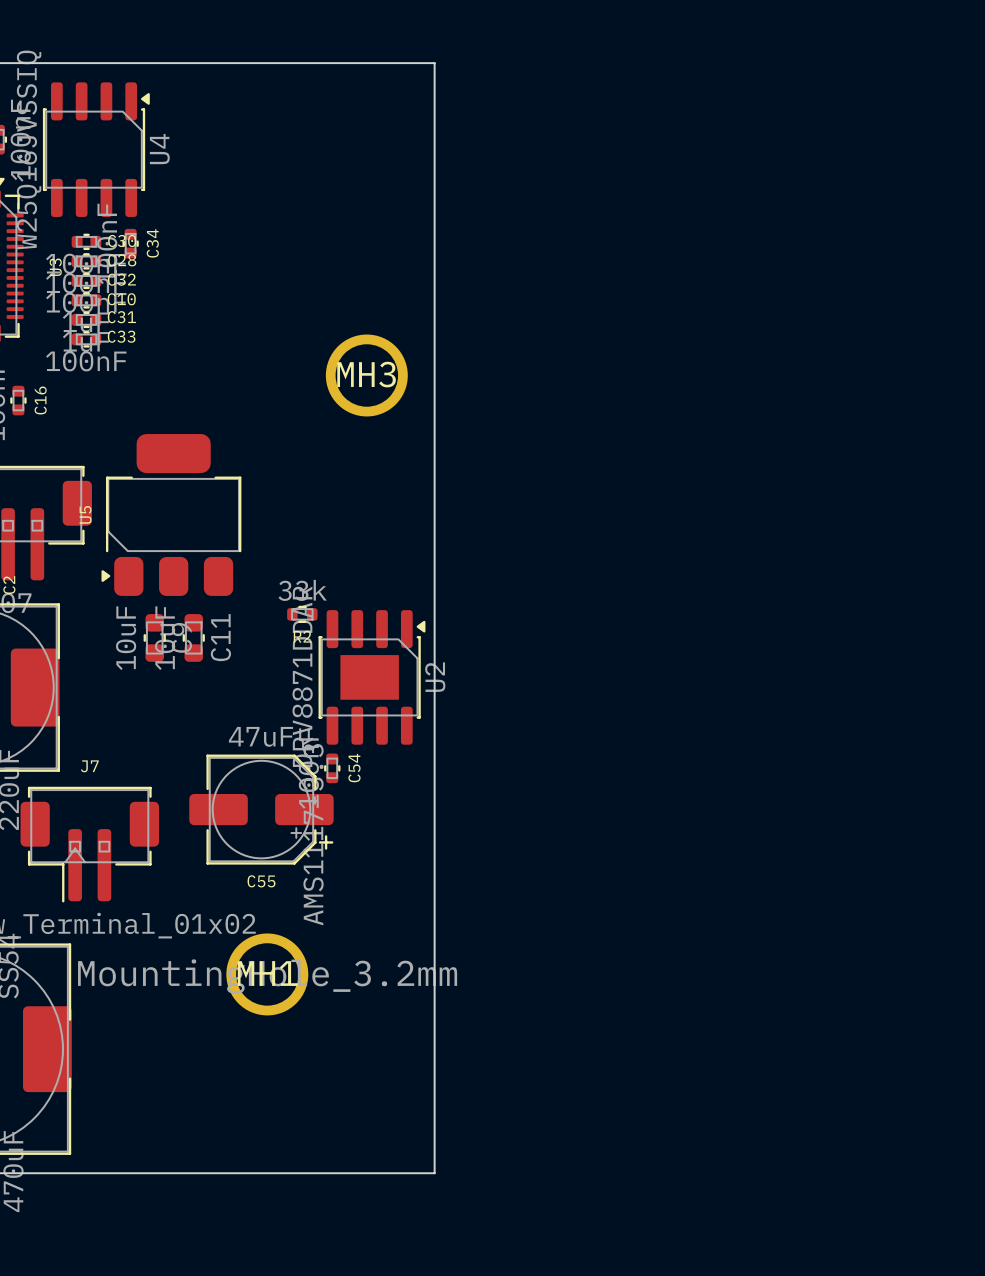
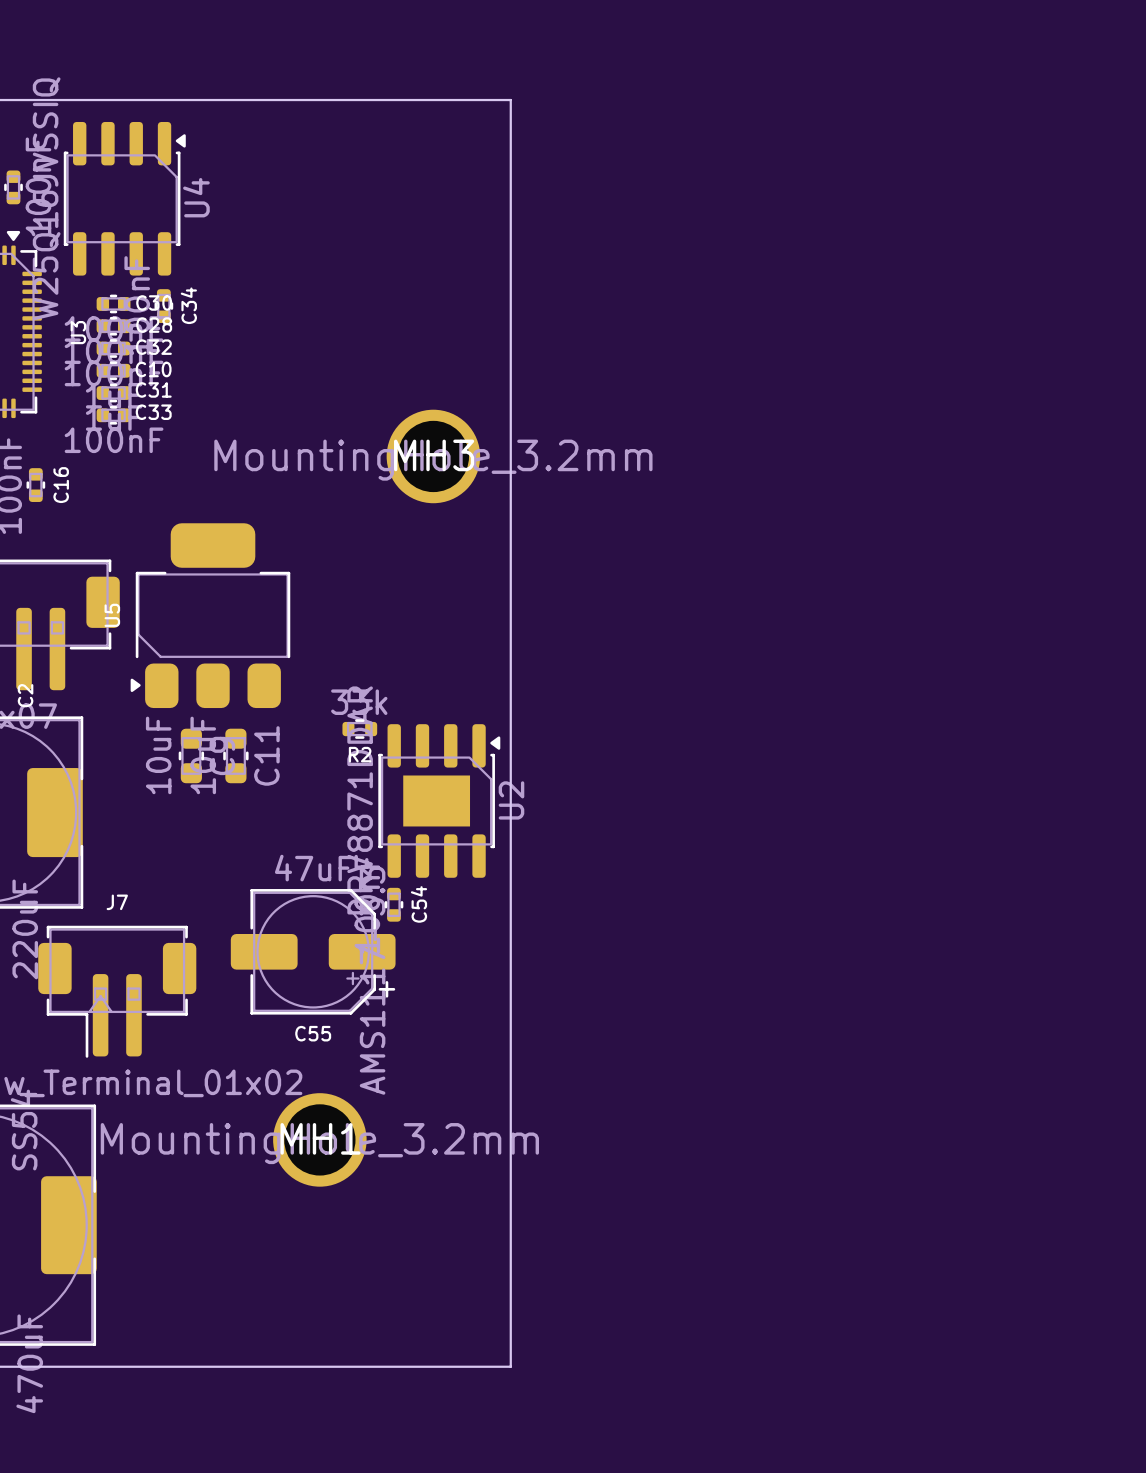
MH3 value: none -> MountingHole_3.2mm (433, 460)

